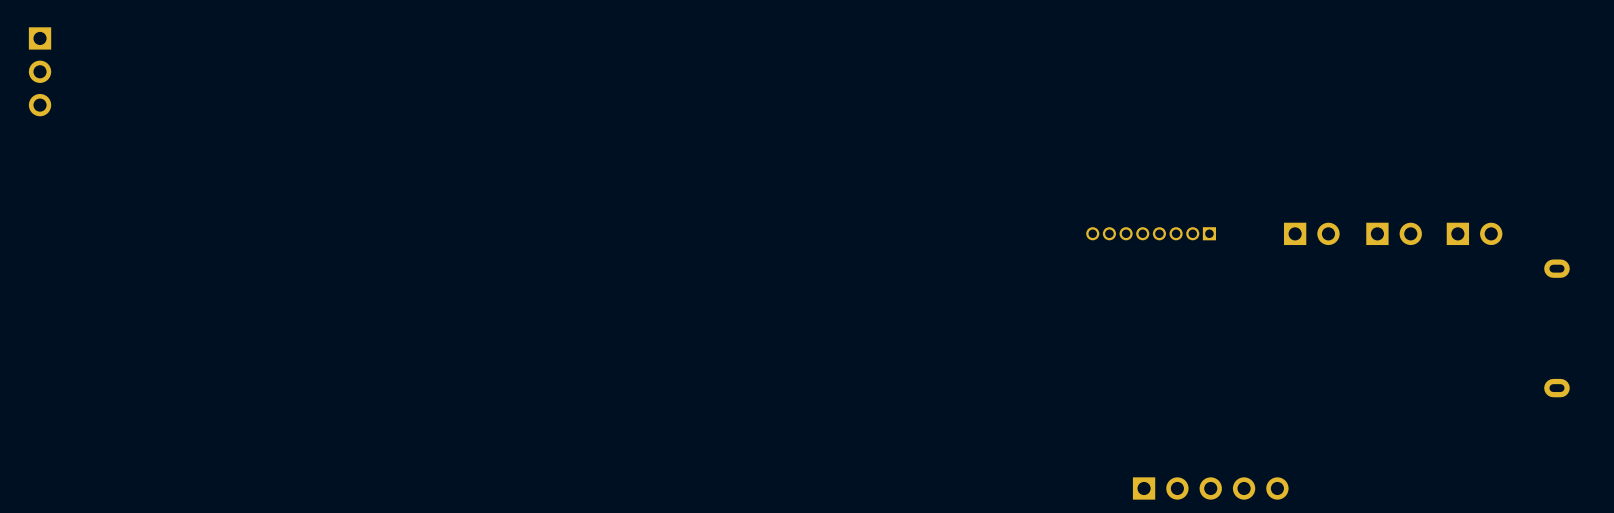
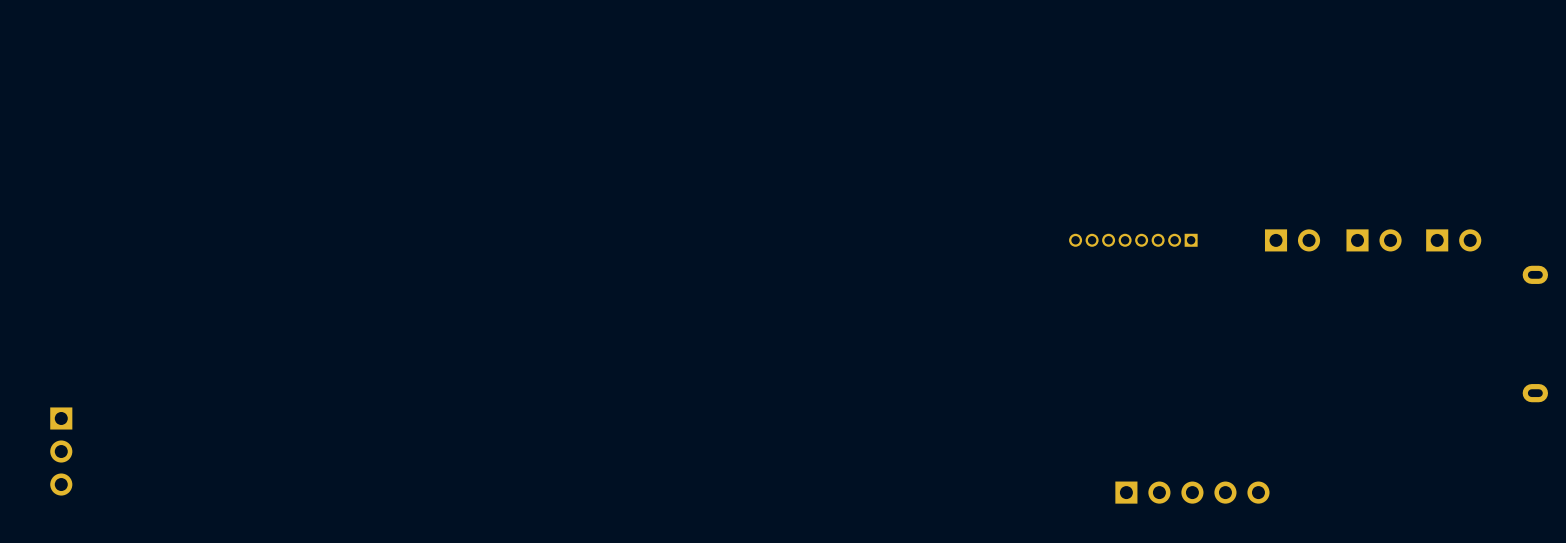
part: (40, 71) -> none
part: none -> (61, 451)

